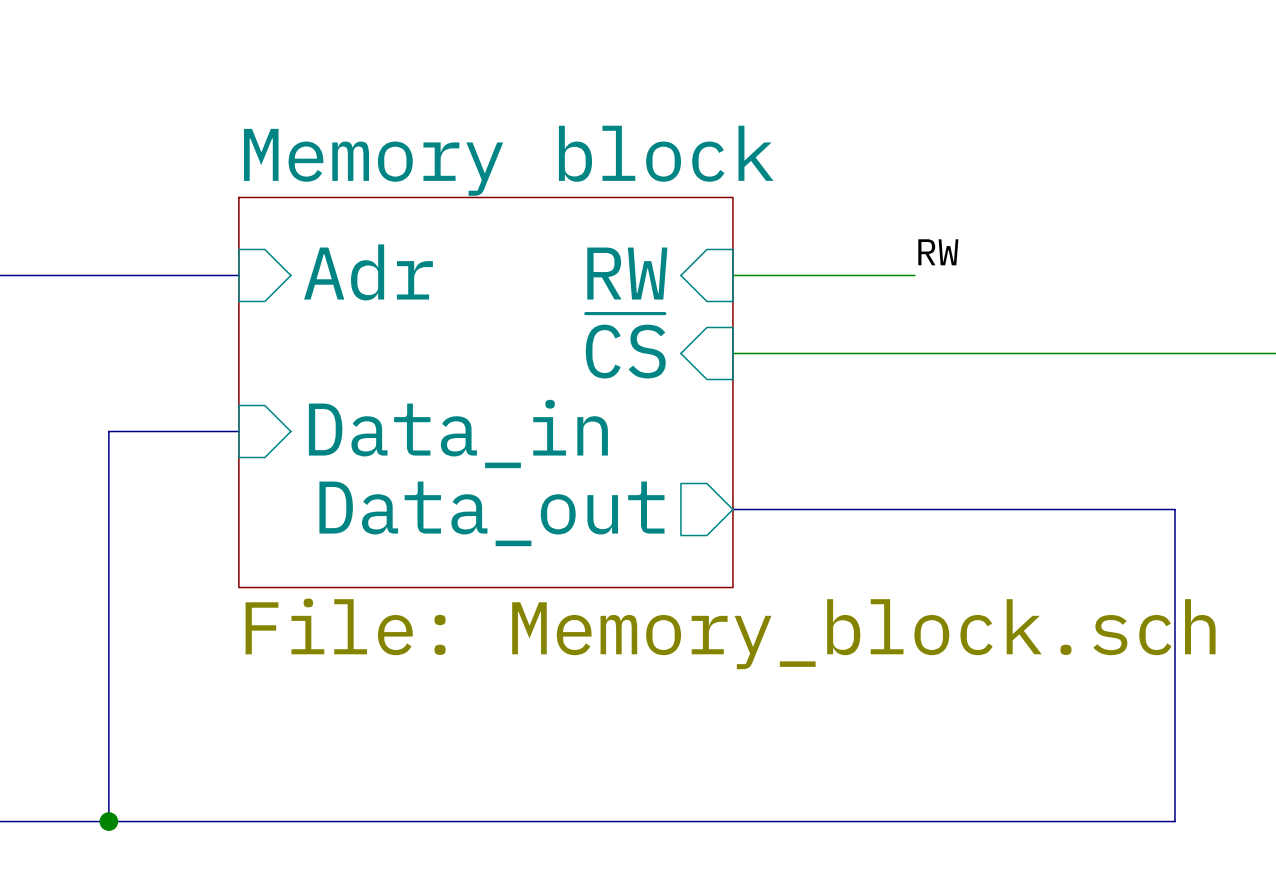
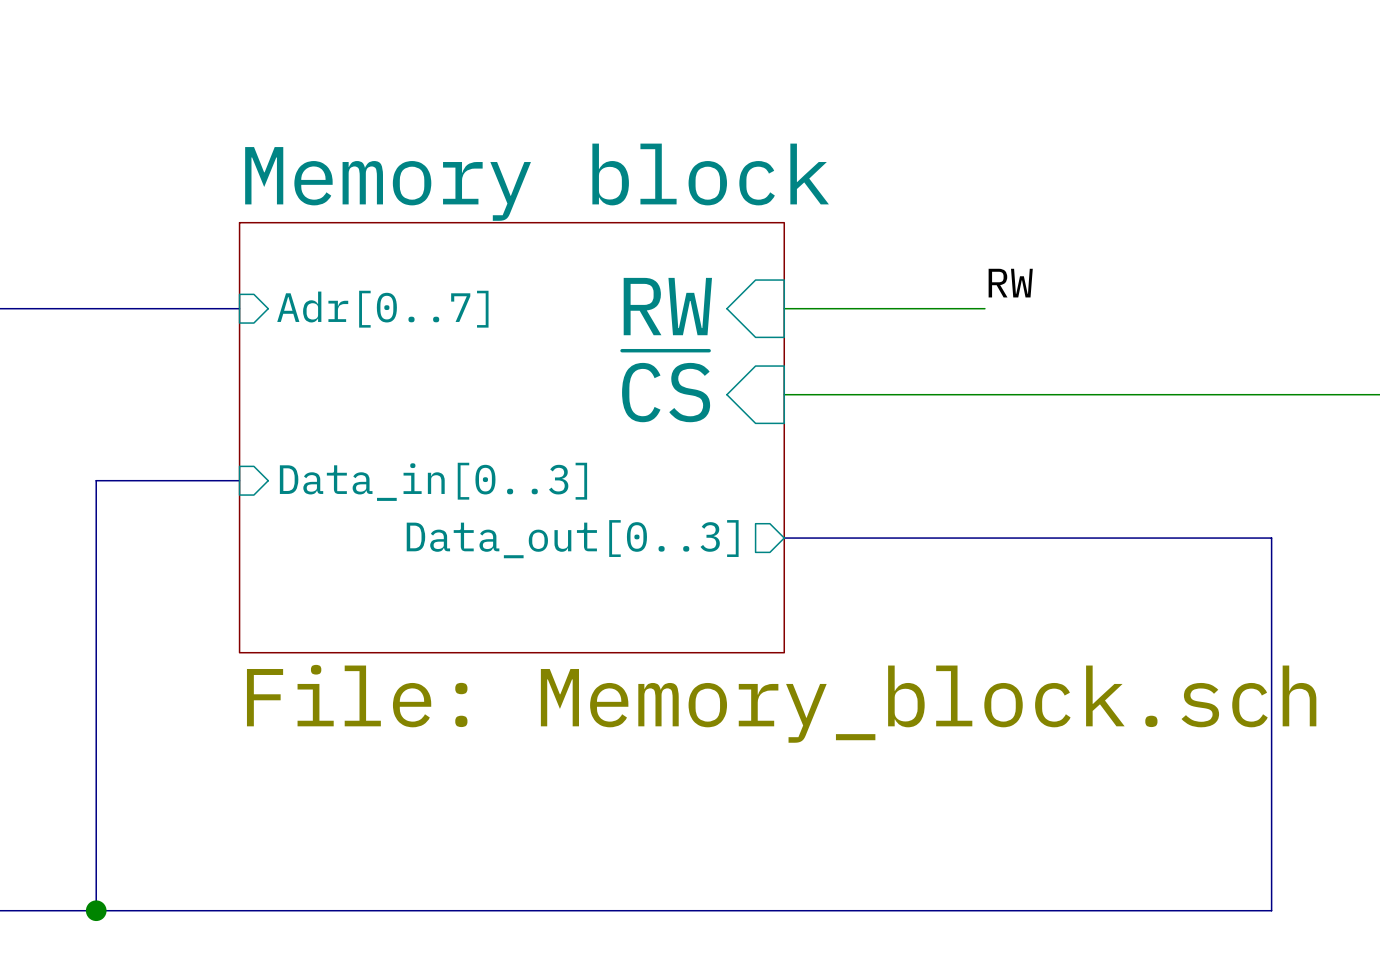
sheet pin: Adr (368, 272) -> none
sheet pin: none -> Adr[0..7] (382, 309)
sheet pin: Data_in (458, 434) -> Data_in[0..3] (433, 481)
bus: (732, 509) (1175, 509) -> (784, 538) (1271, 538) (1271, 566)
sheet pin: Data_out (491, 513) -> Data_out[0..3] (572, 539)

